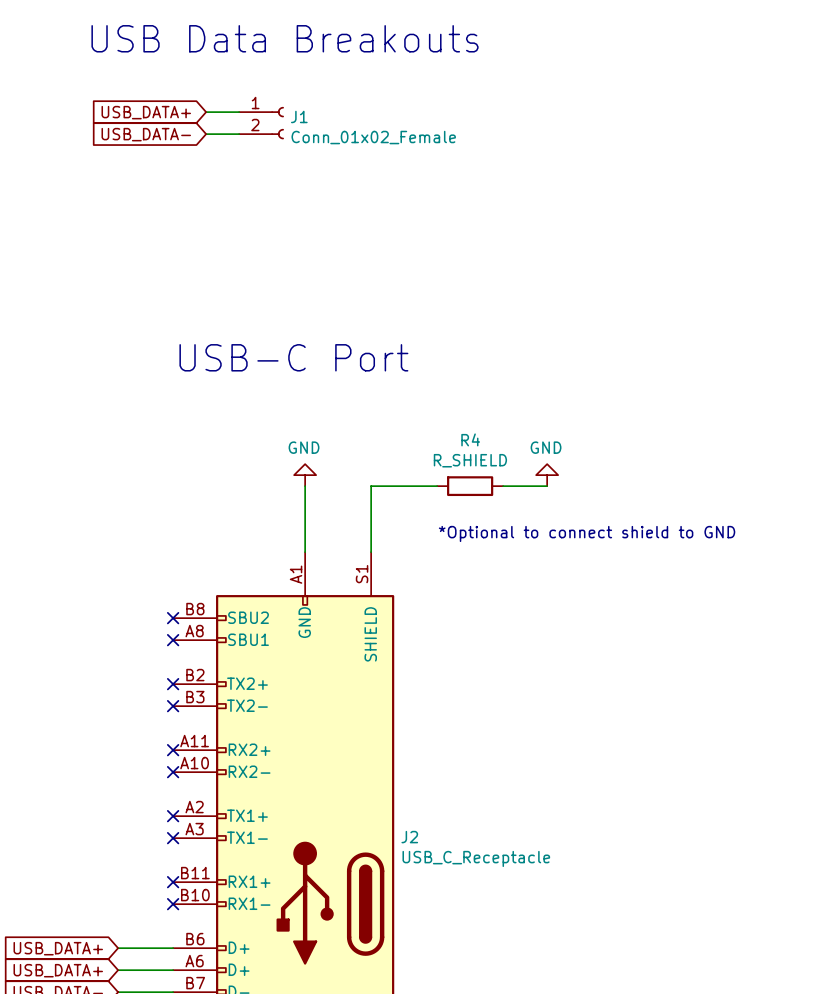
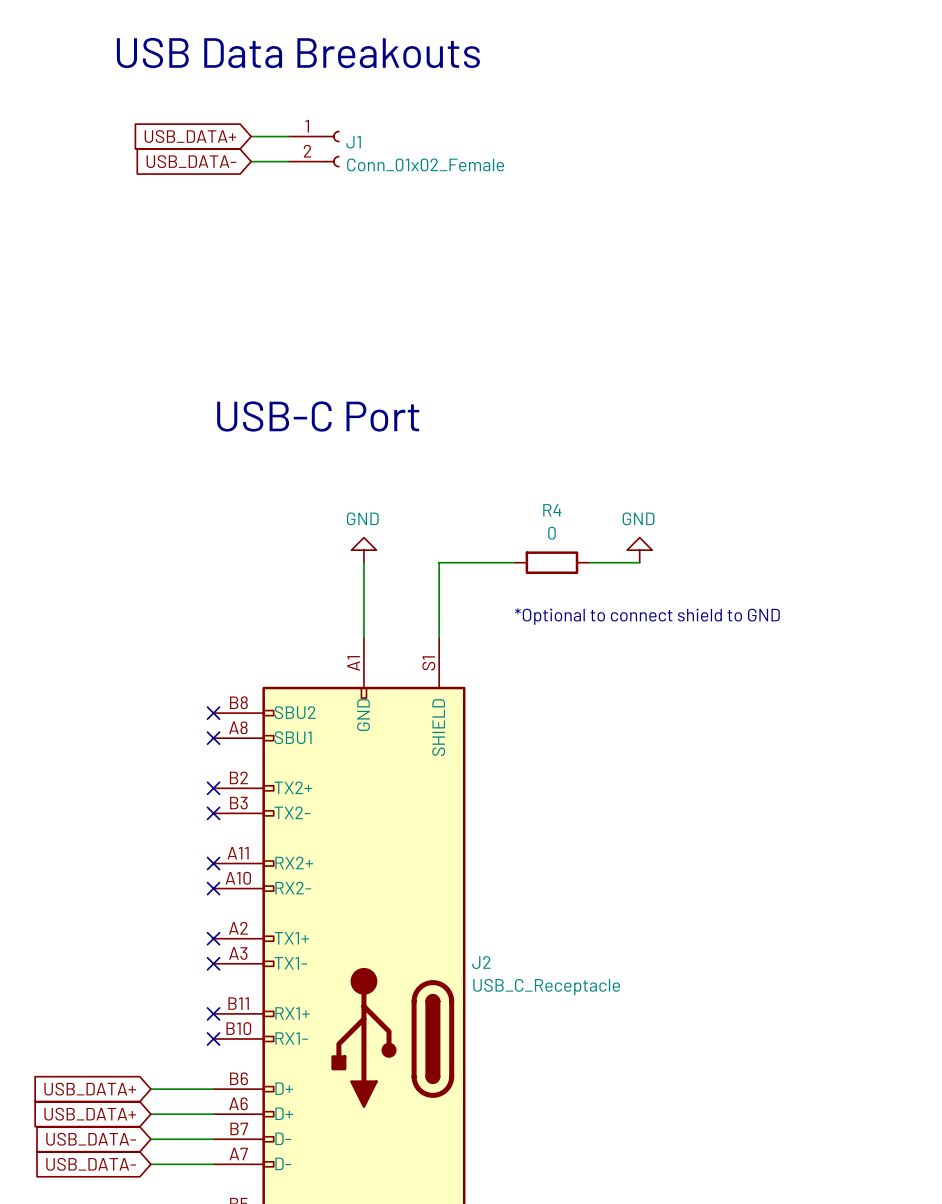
R4 value: R_SHIELD (470, 460) -> 0 (551, 533)

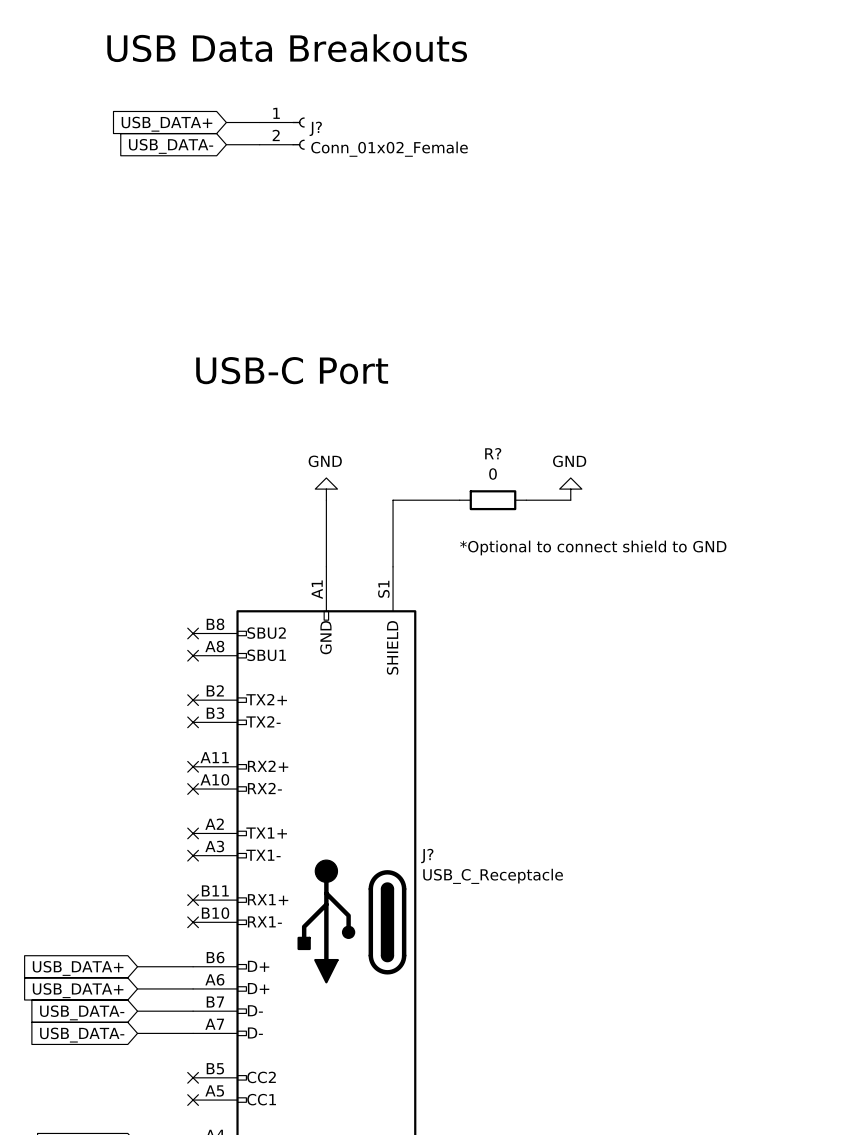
J1 name: J1 (353, 142) -> J? (315, 128)
R4 name: R4 (552, 510) -> R? (493, 453)
J2 name: J2 (481, 962) -> J? (427, 856)

